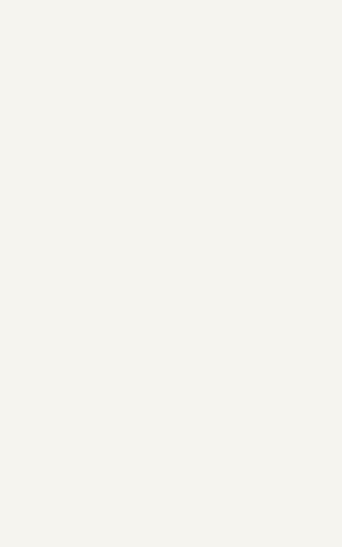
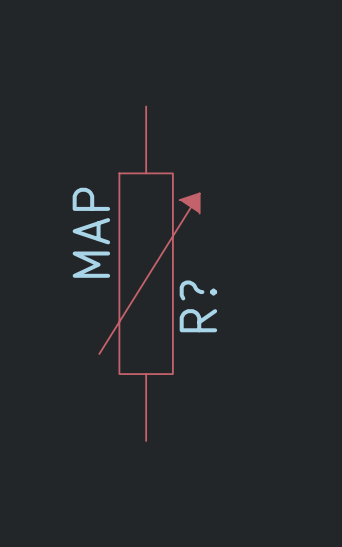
R?: none -> MAP (149, 273)

